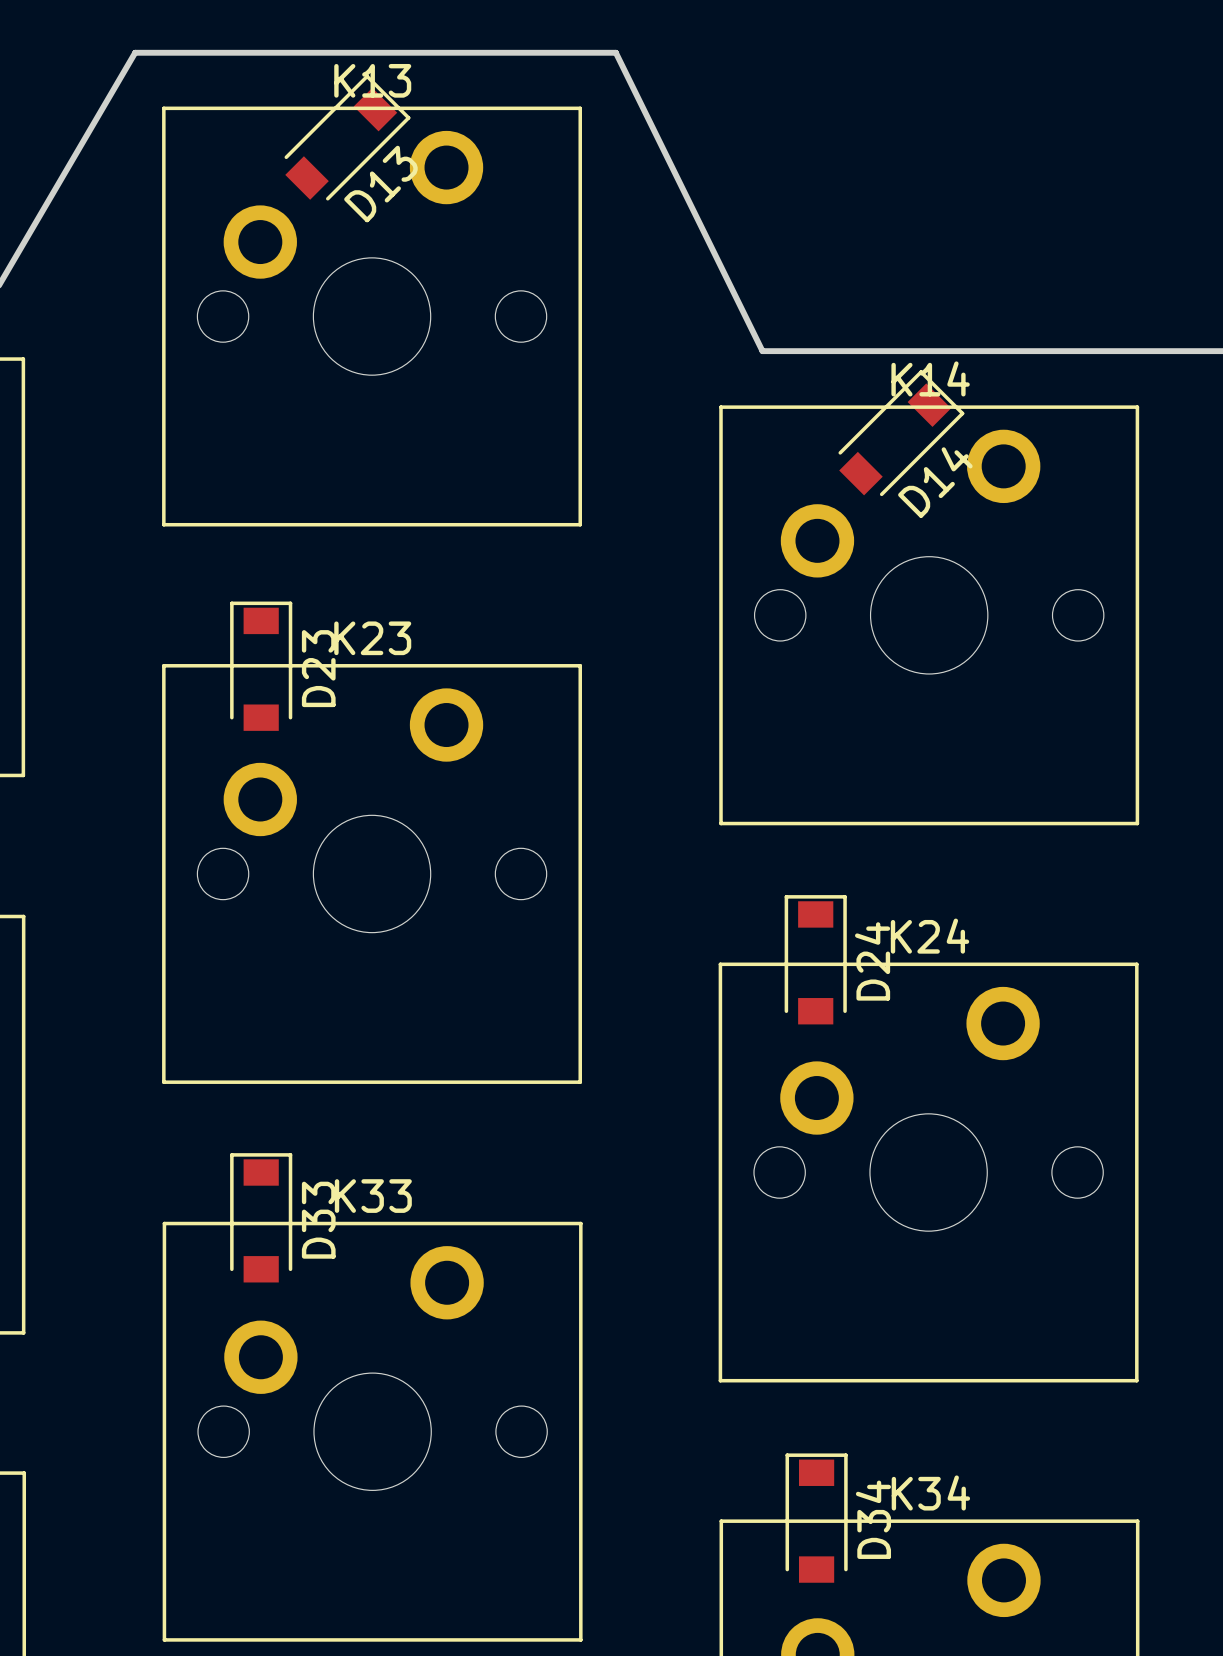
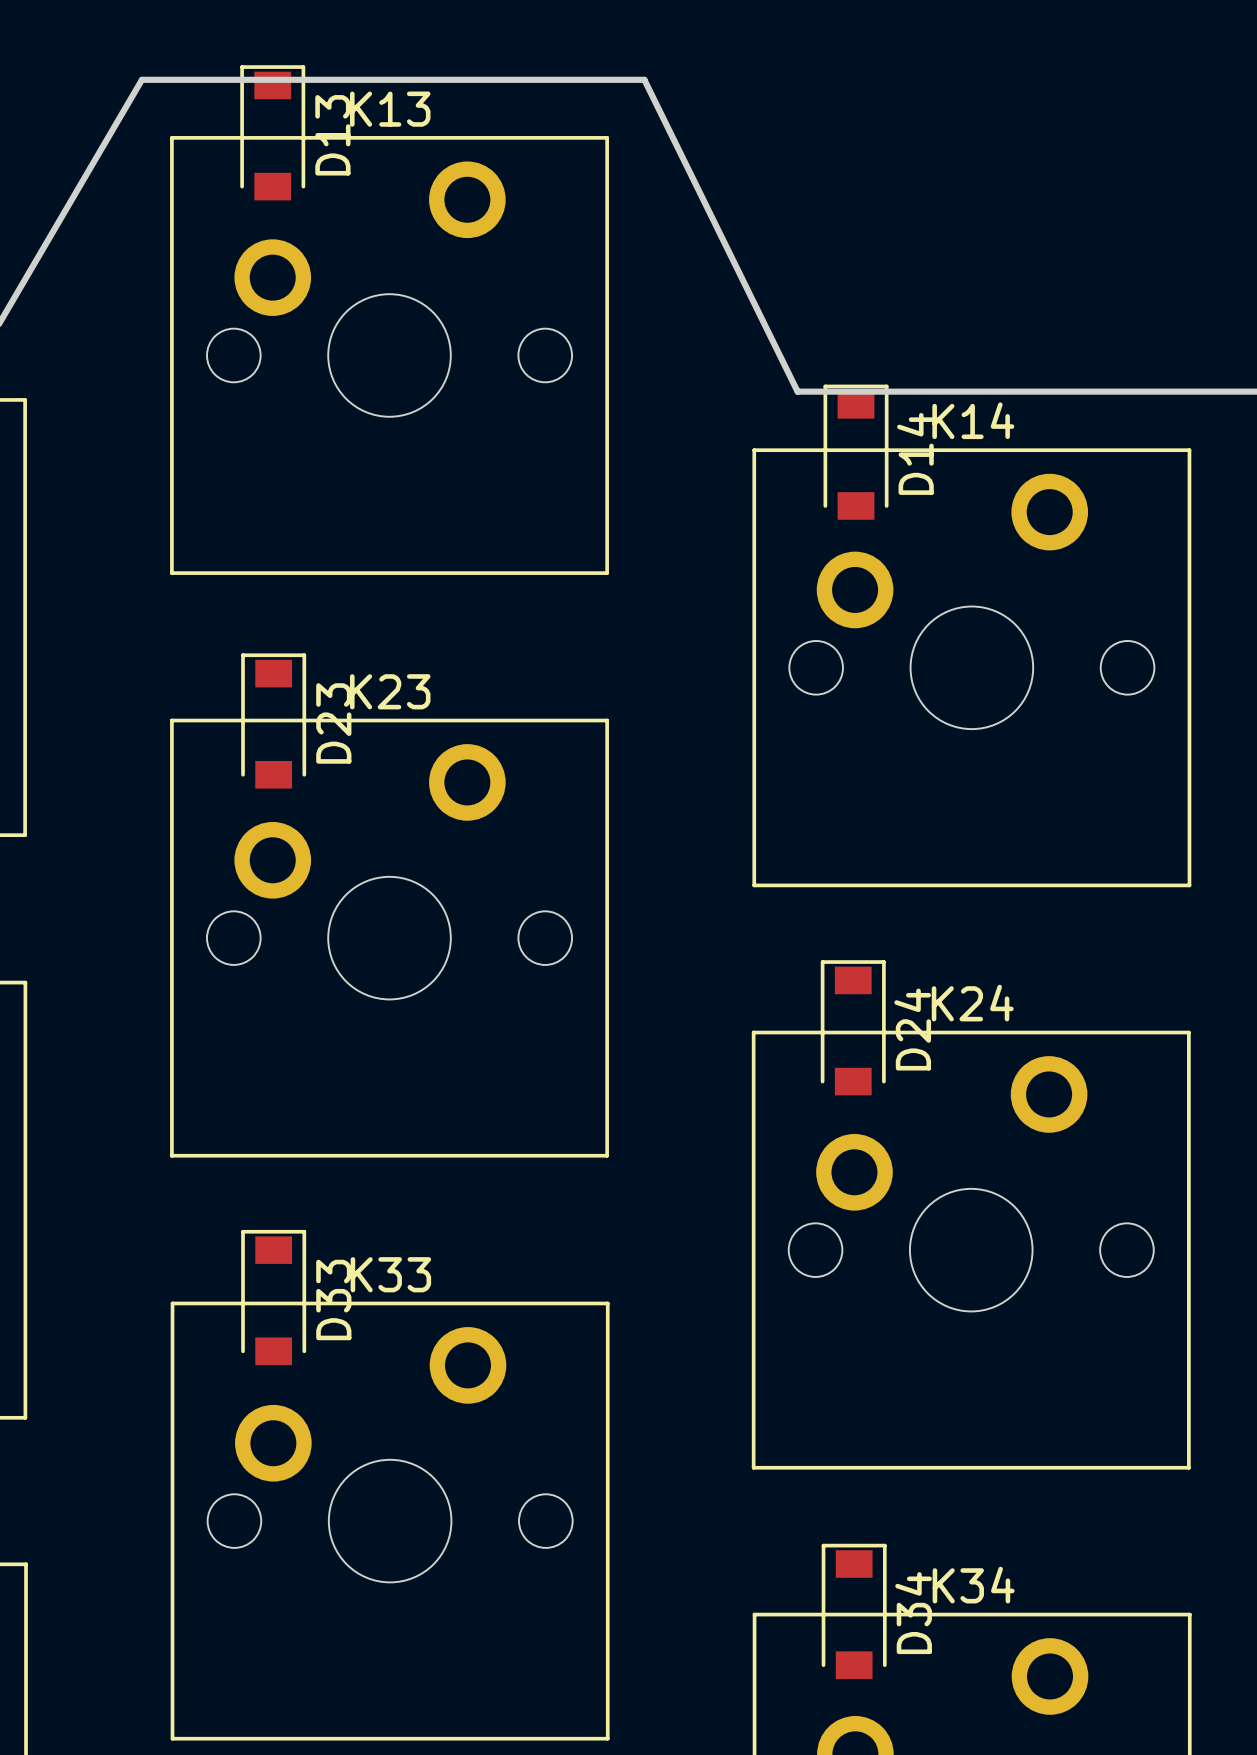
D13 rotation: 0° (347, 137) -> 45° counterclockwise (272, 132)
D13 position: (347, 137) -> (272, 132)
D14 rotation: 0° (901, 433) -> 45° counterclockwise (856, 452)
D14 position: (901, 433) -> (856, 452)

